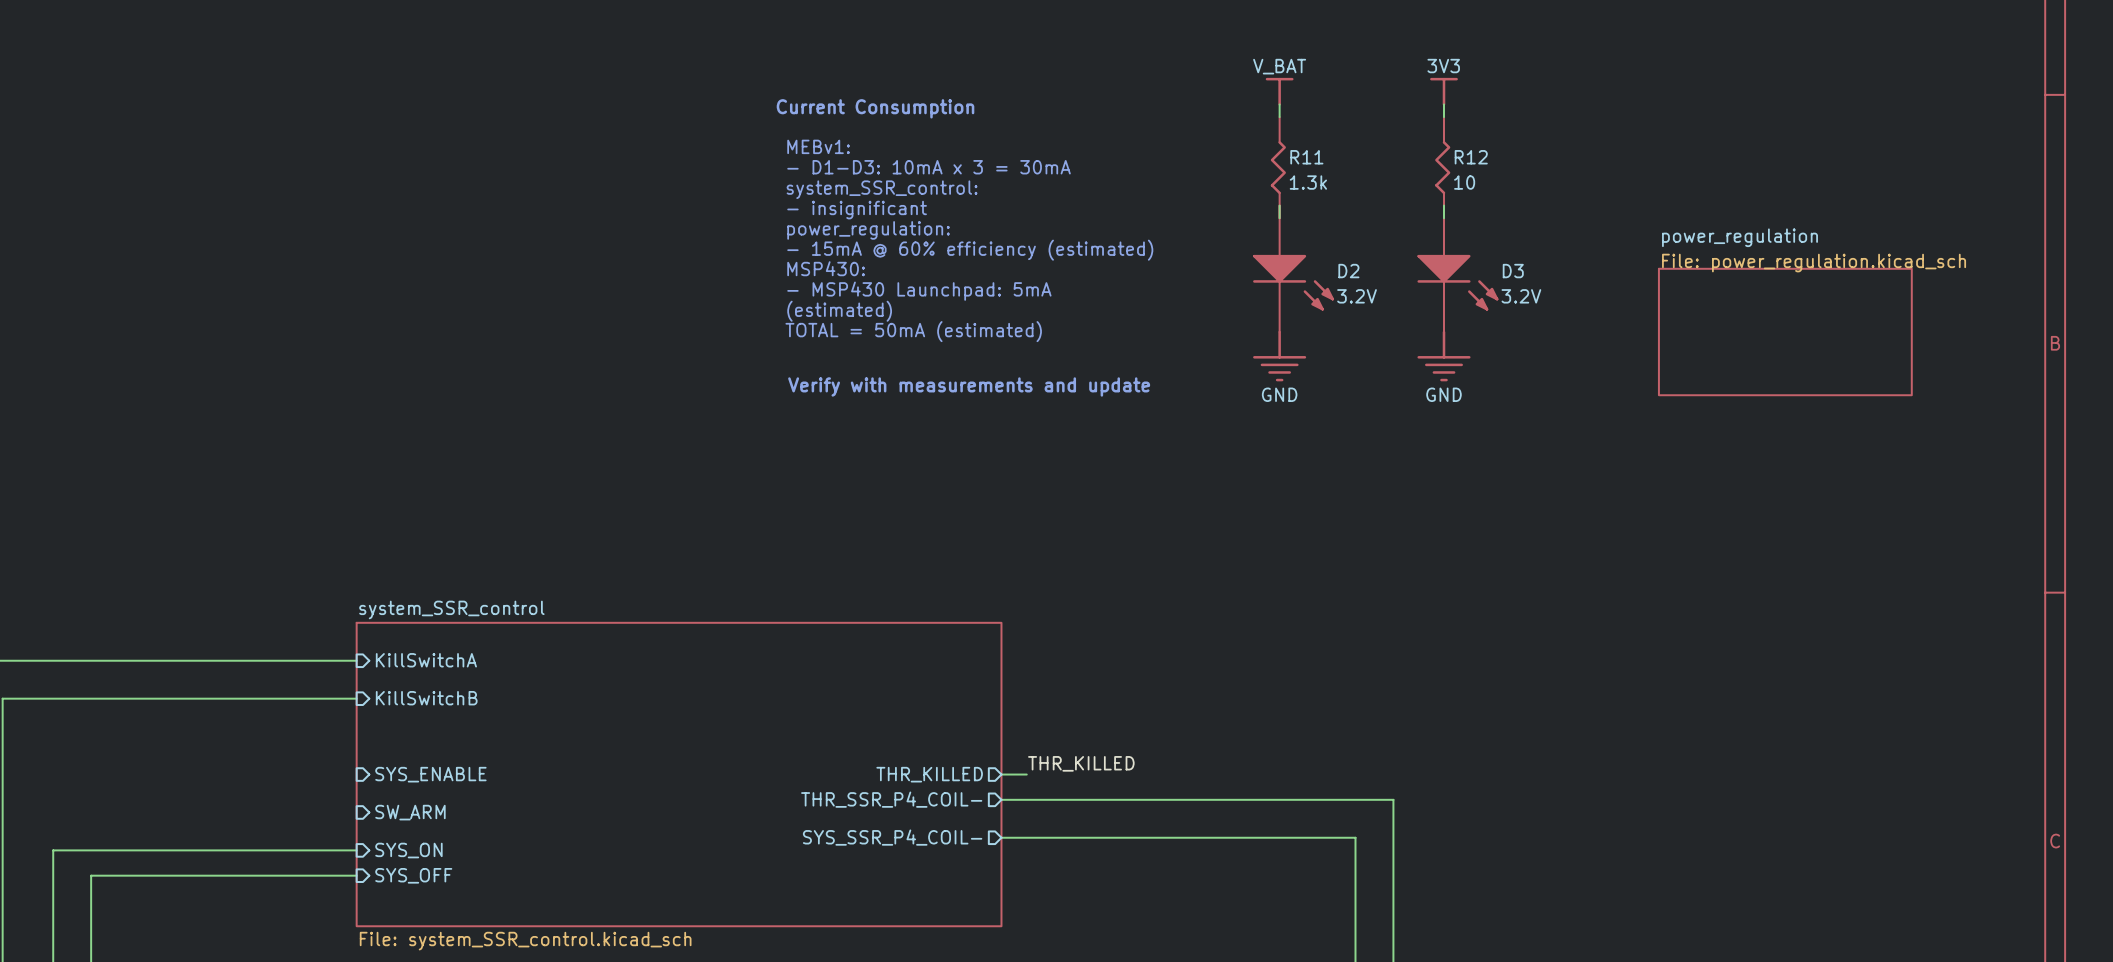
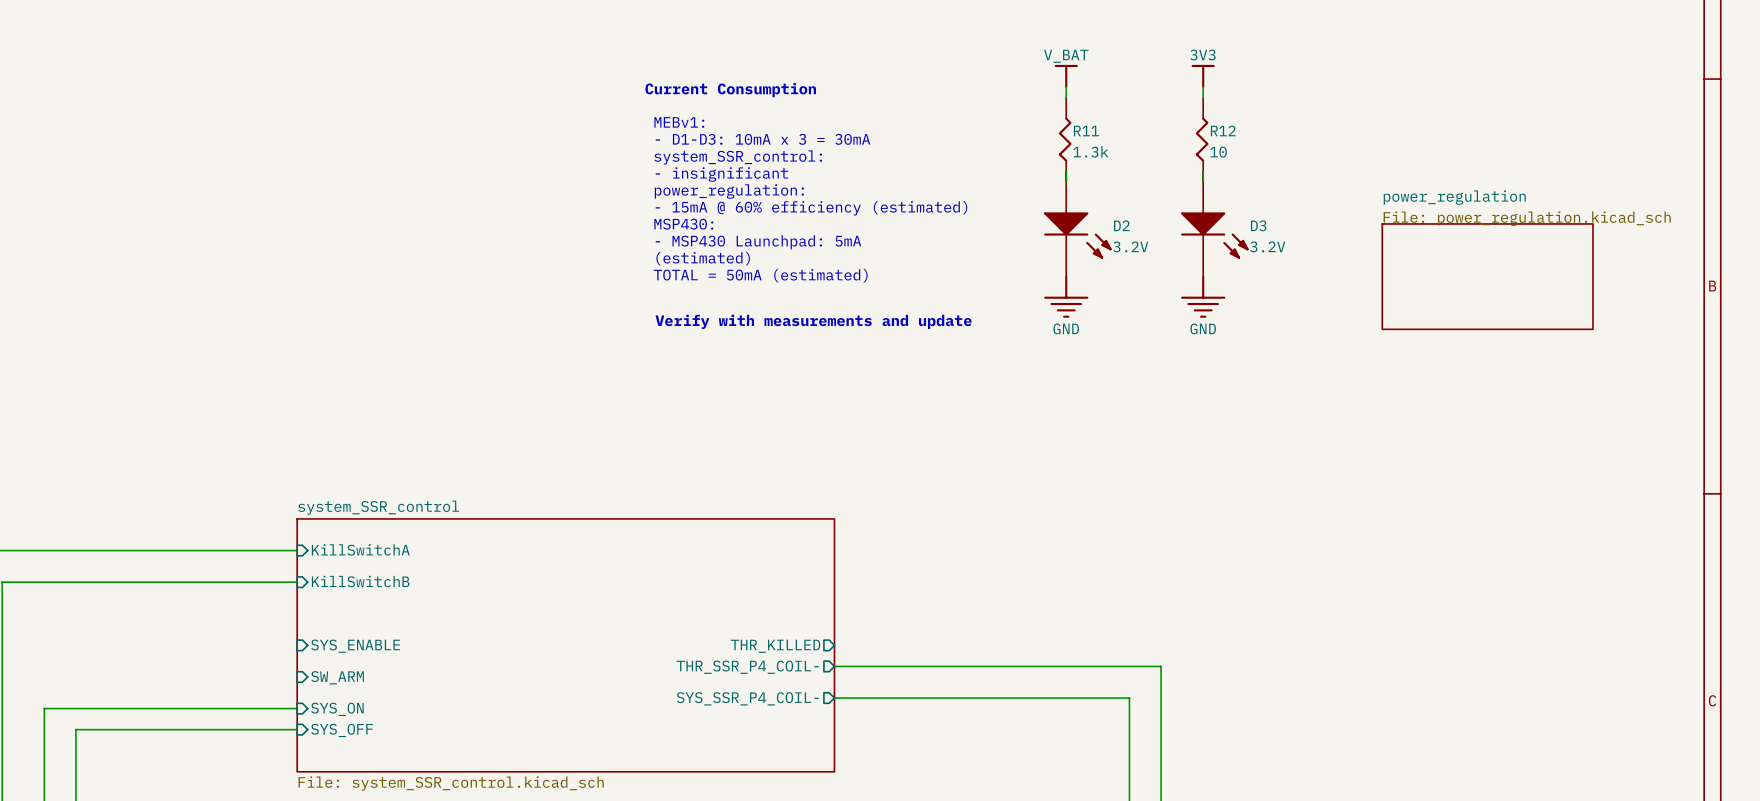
label: THR_KILLED (1081, 763) -> none
wire: (1001, 774) (1026, 774) -> none

